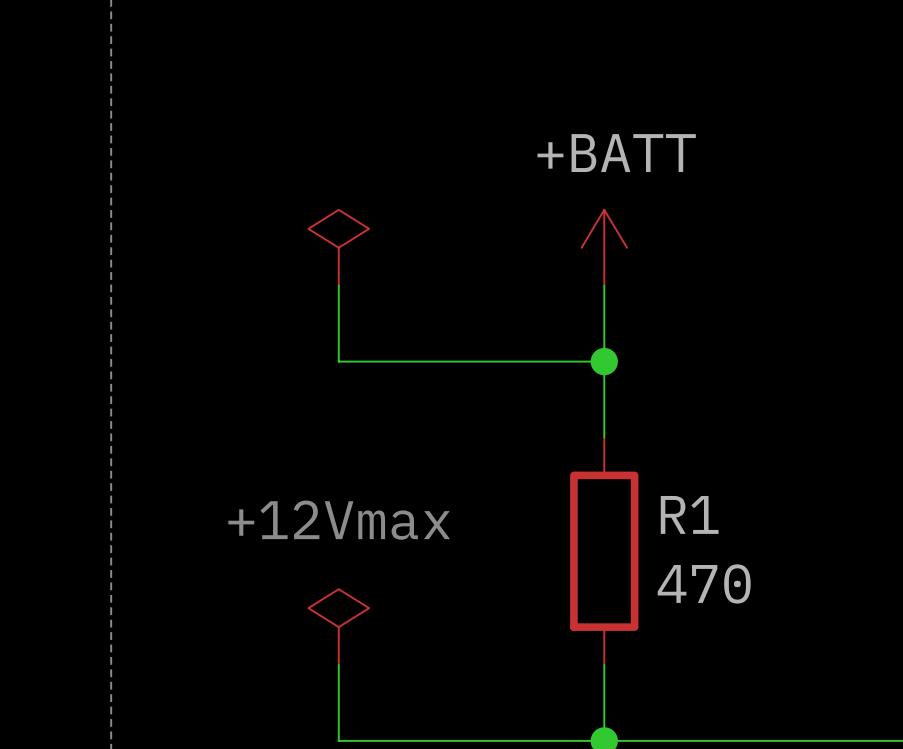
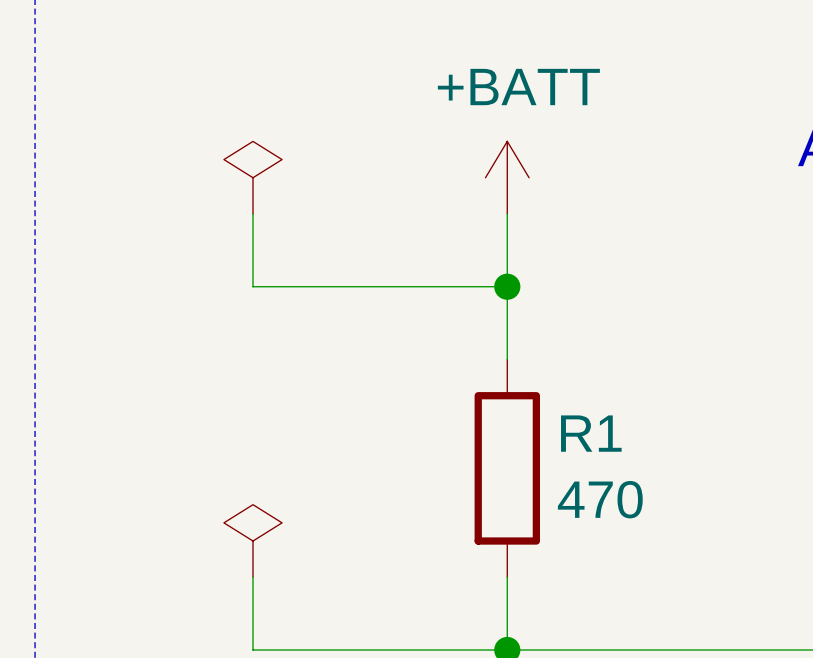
text: +12Vmax (339, 520) -> none

